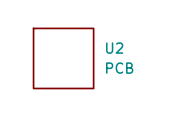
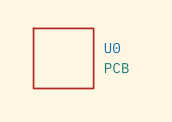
U2 name: U2 (114, 48) -> U0 (112, 48)

